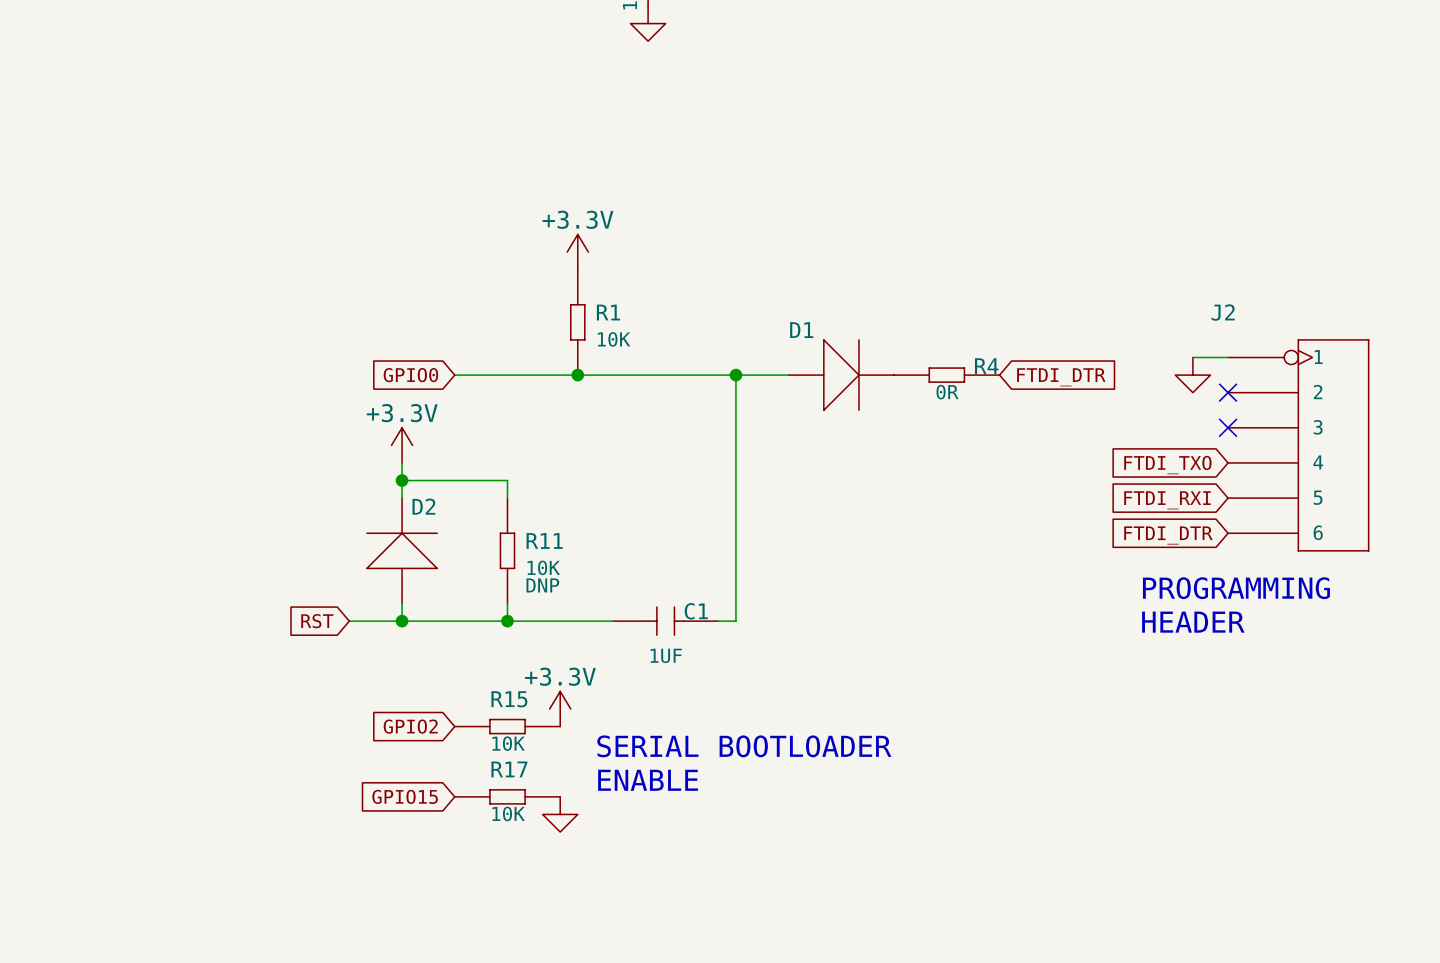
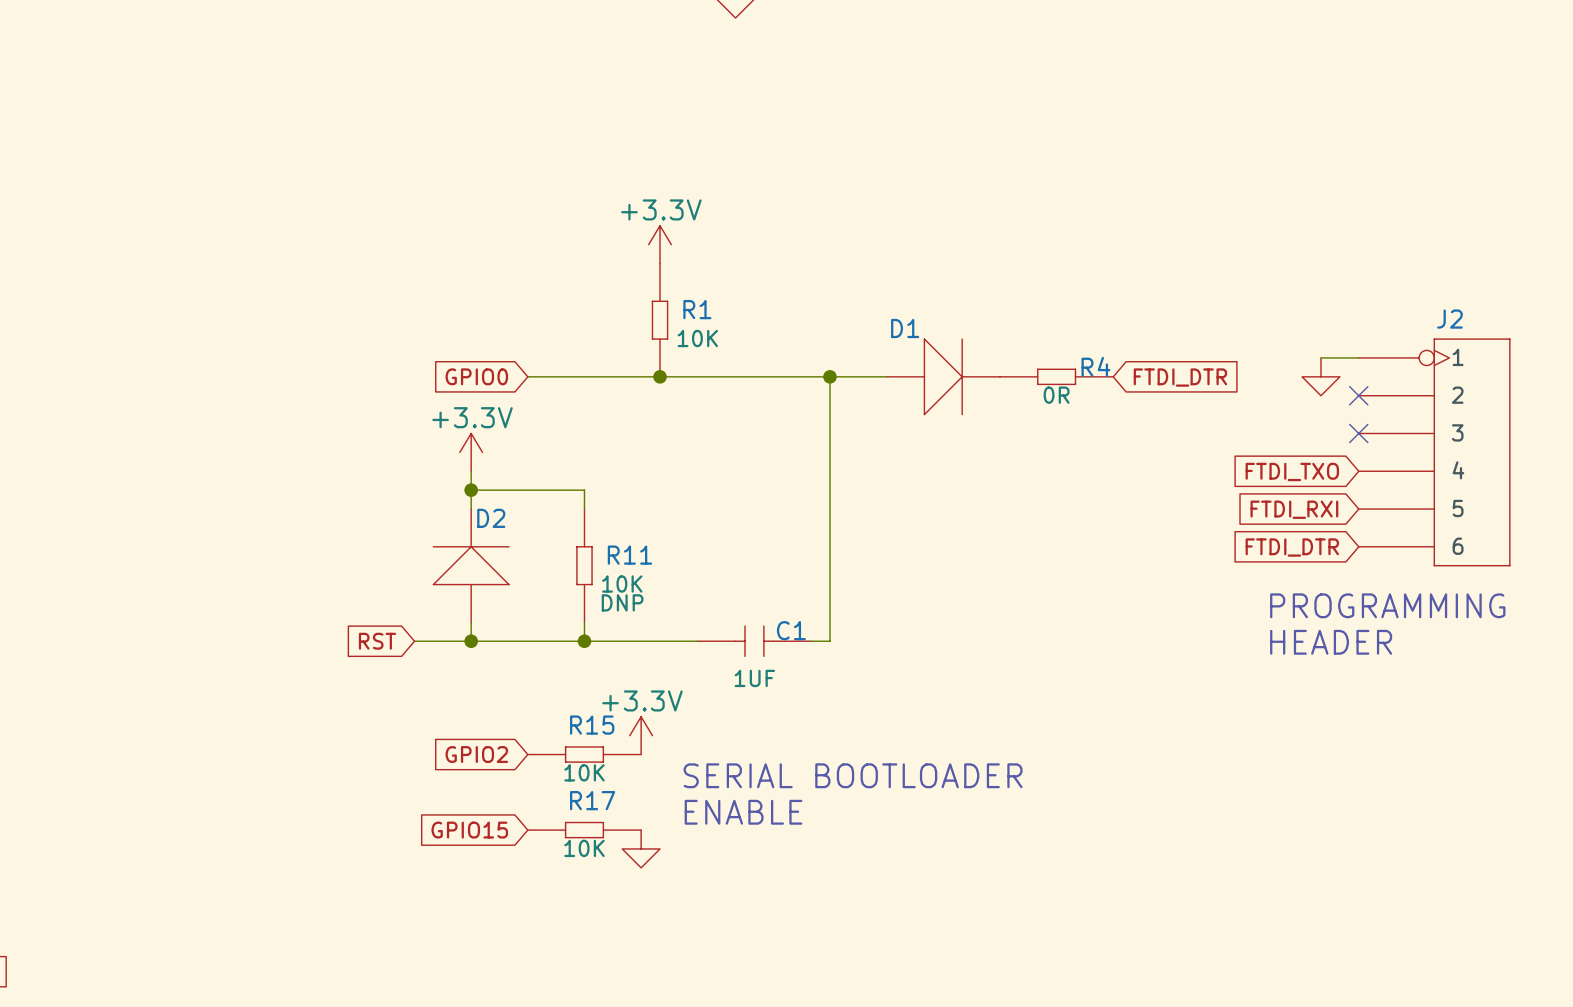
J2 name position: J2 (1223, 312) -> J2 (1449, 319)

